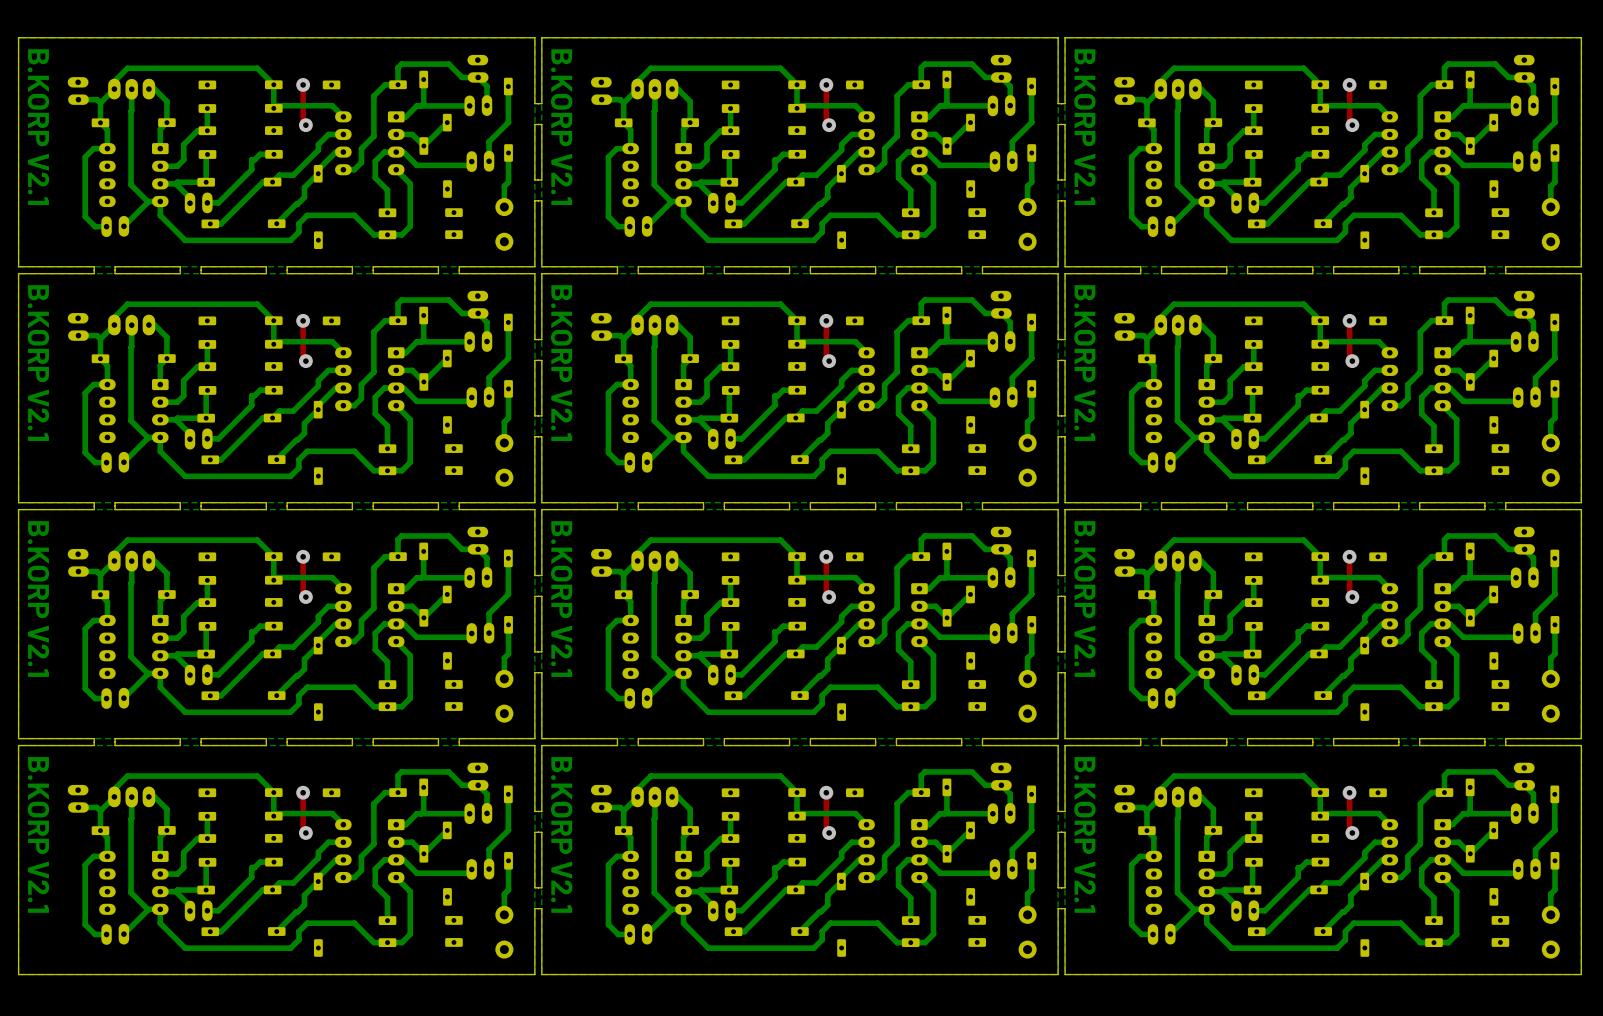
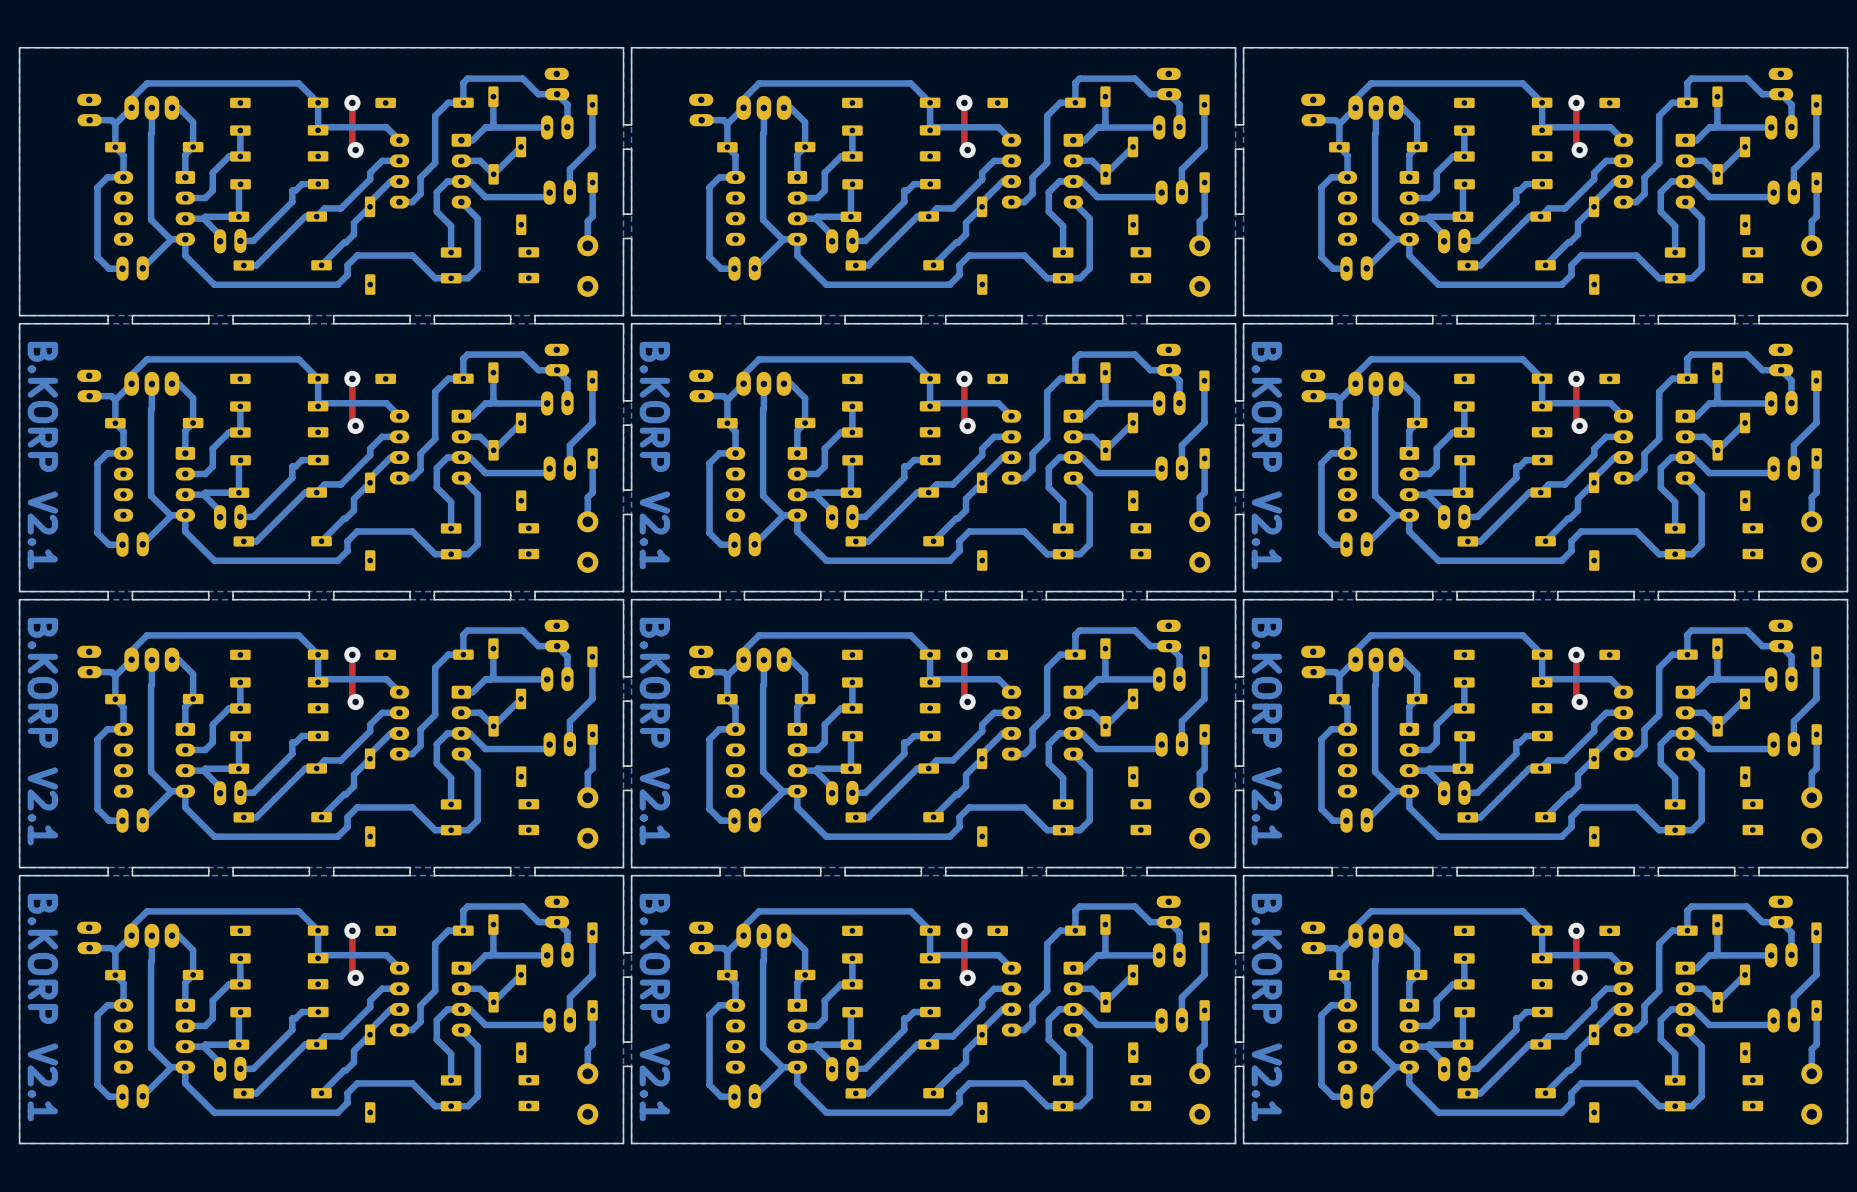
text: B.KORP V2.1 (38, 127) -> none
text: B.KORP V2.1 (561, 127) -> none
text: B.KORP V2.1 (1084, 127) -> none

